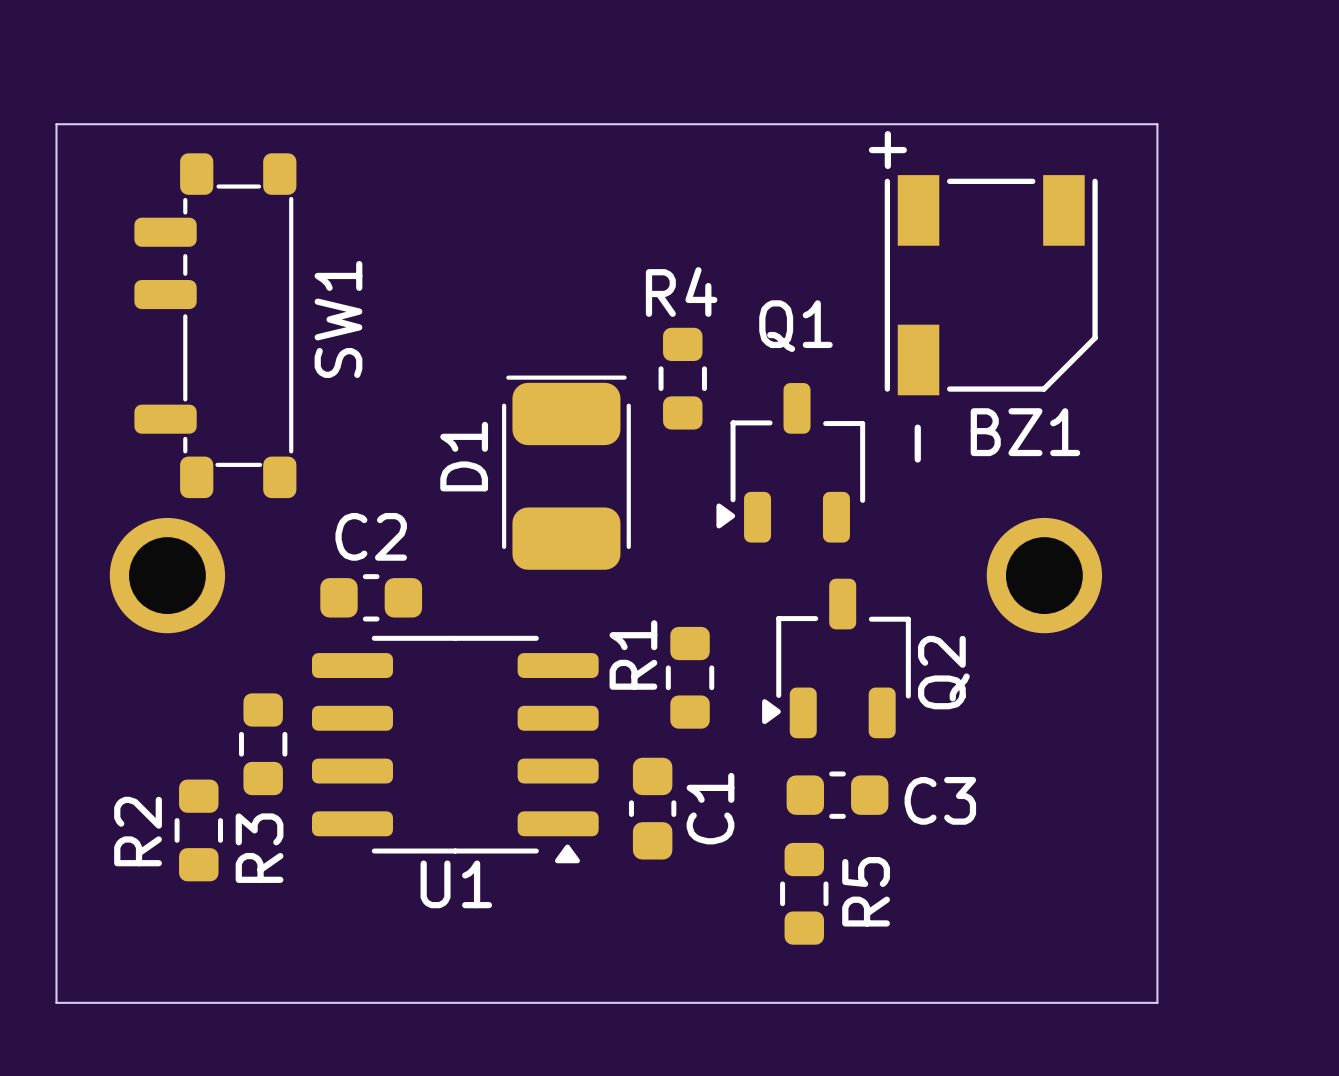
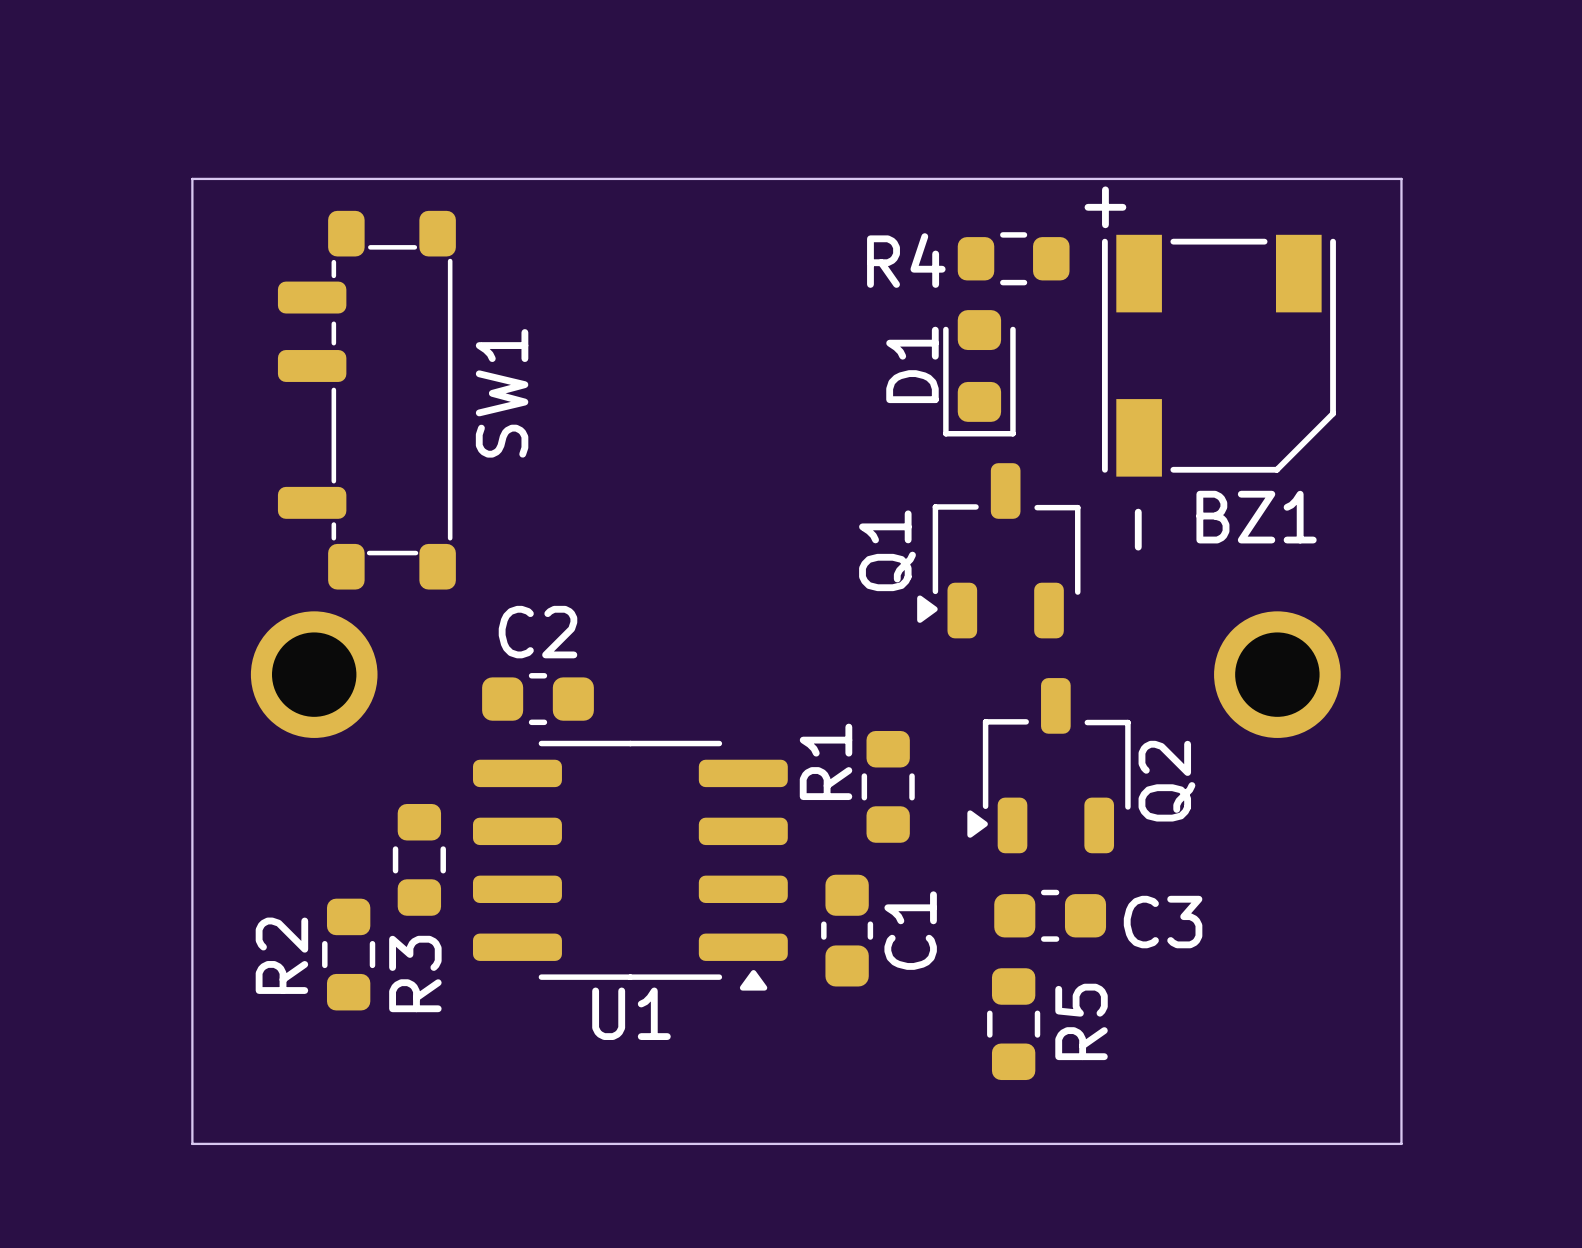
R4 name position: R4 (681, 292) -> R4 (906, 260)
Q1 name rotation: 0° (795, 326) -> 90° counterclockwise (887, 550)
Q1 name position: Q1 (795, 326) -> Q1 (887, 550)
D1 footprint: [502, 375, 631, 570] -> [943, 310, 1016, 437]
R4 rotation: 0° (682, 378) -> 90° clockwise (1013, 258)
R4 position: (682, 378) -> (1013, 258)

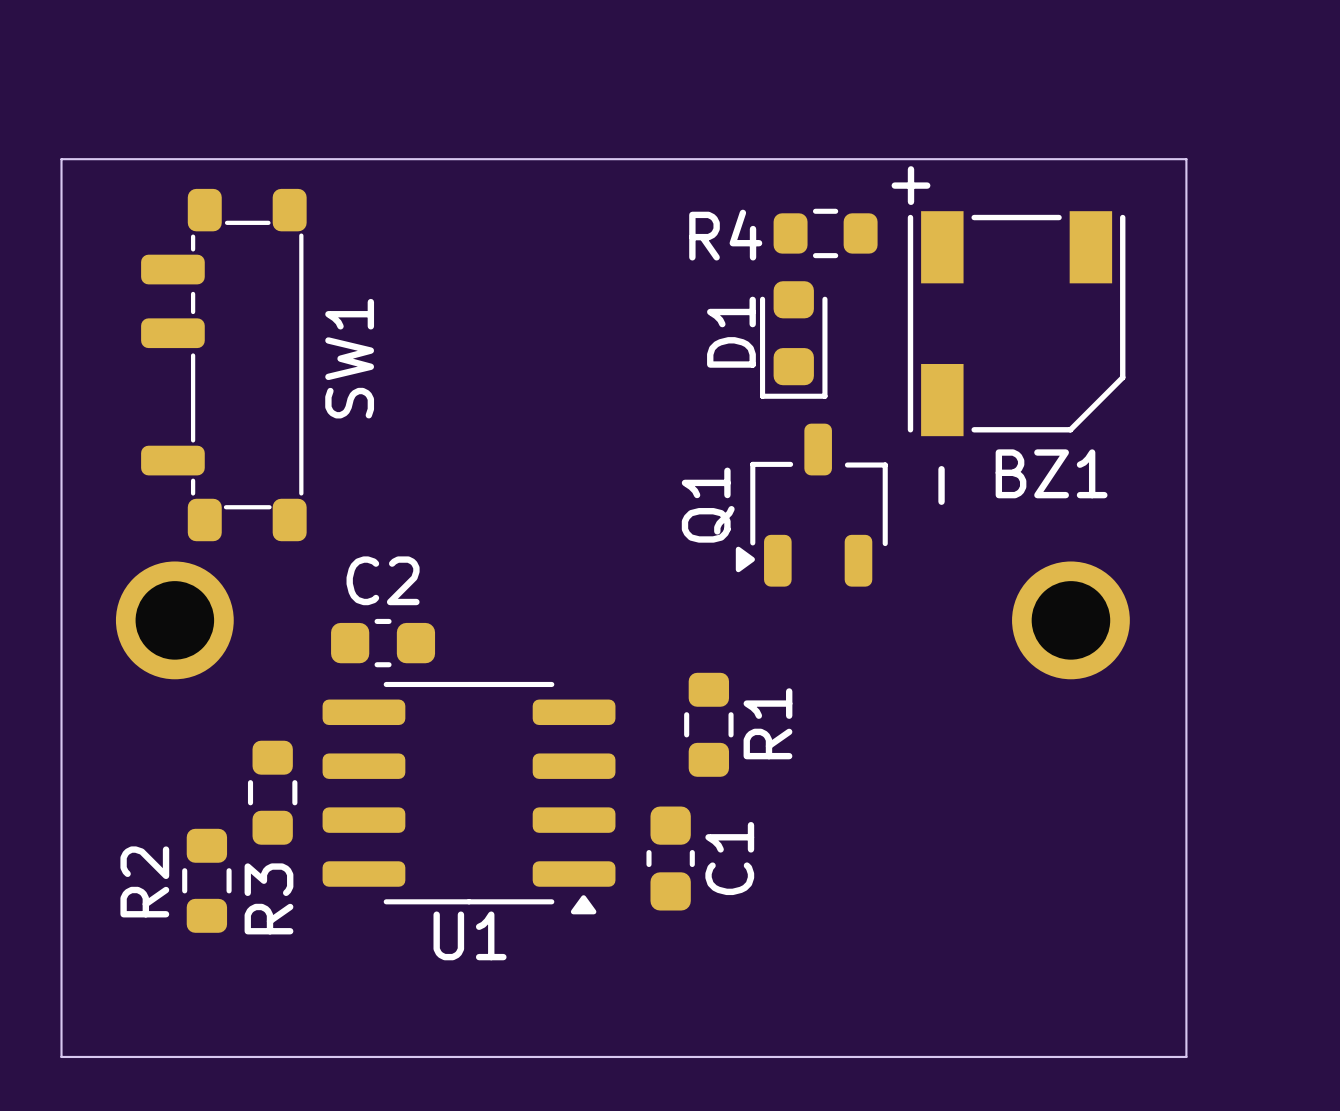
R1 name position: R1 (826, 761) -> R1 (767, 723)
Q2: (1049, 765) -> none
C3: (1050, 915) -> none
R5: (1013, 1024) -> none

